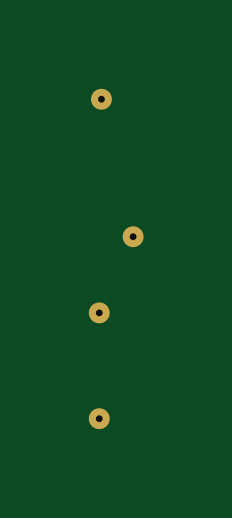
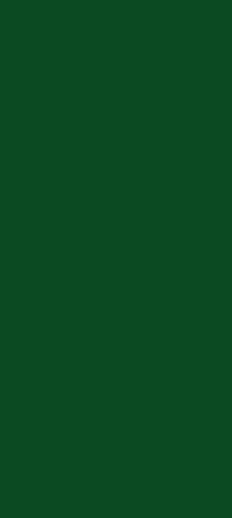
via: (101, 99) -> none
via: (133, 236) -> none
via: (99, 312) -> none
via: (99, 418) -> none

